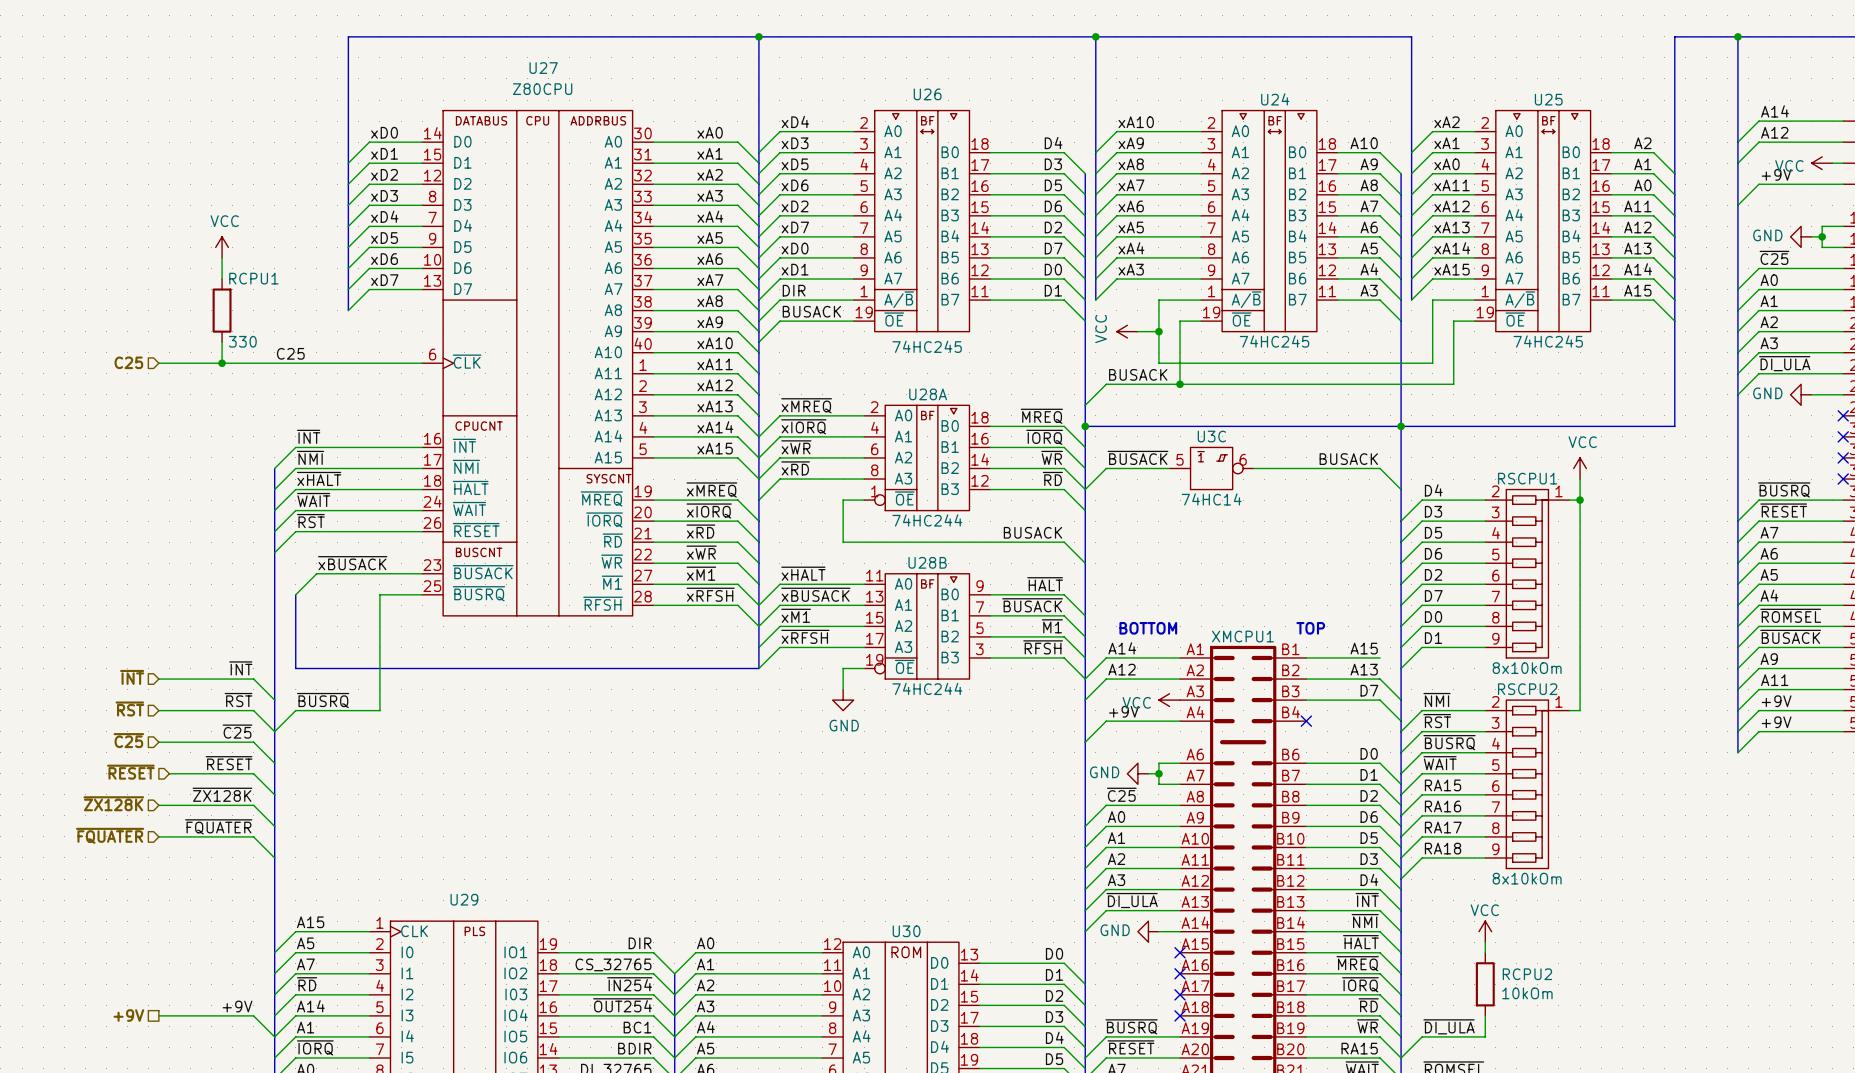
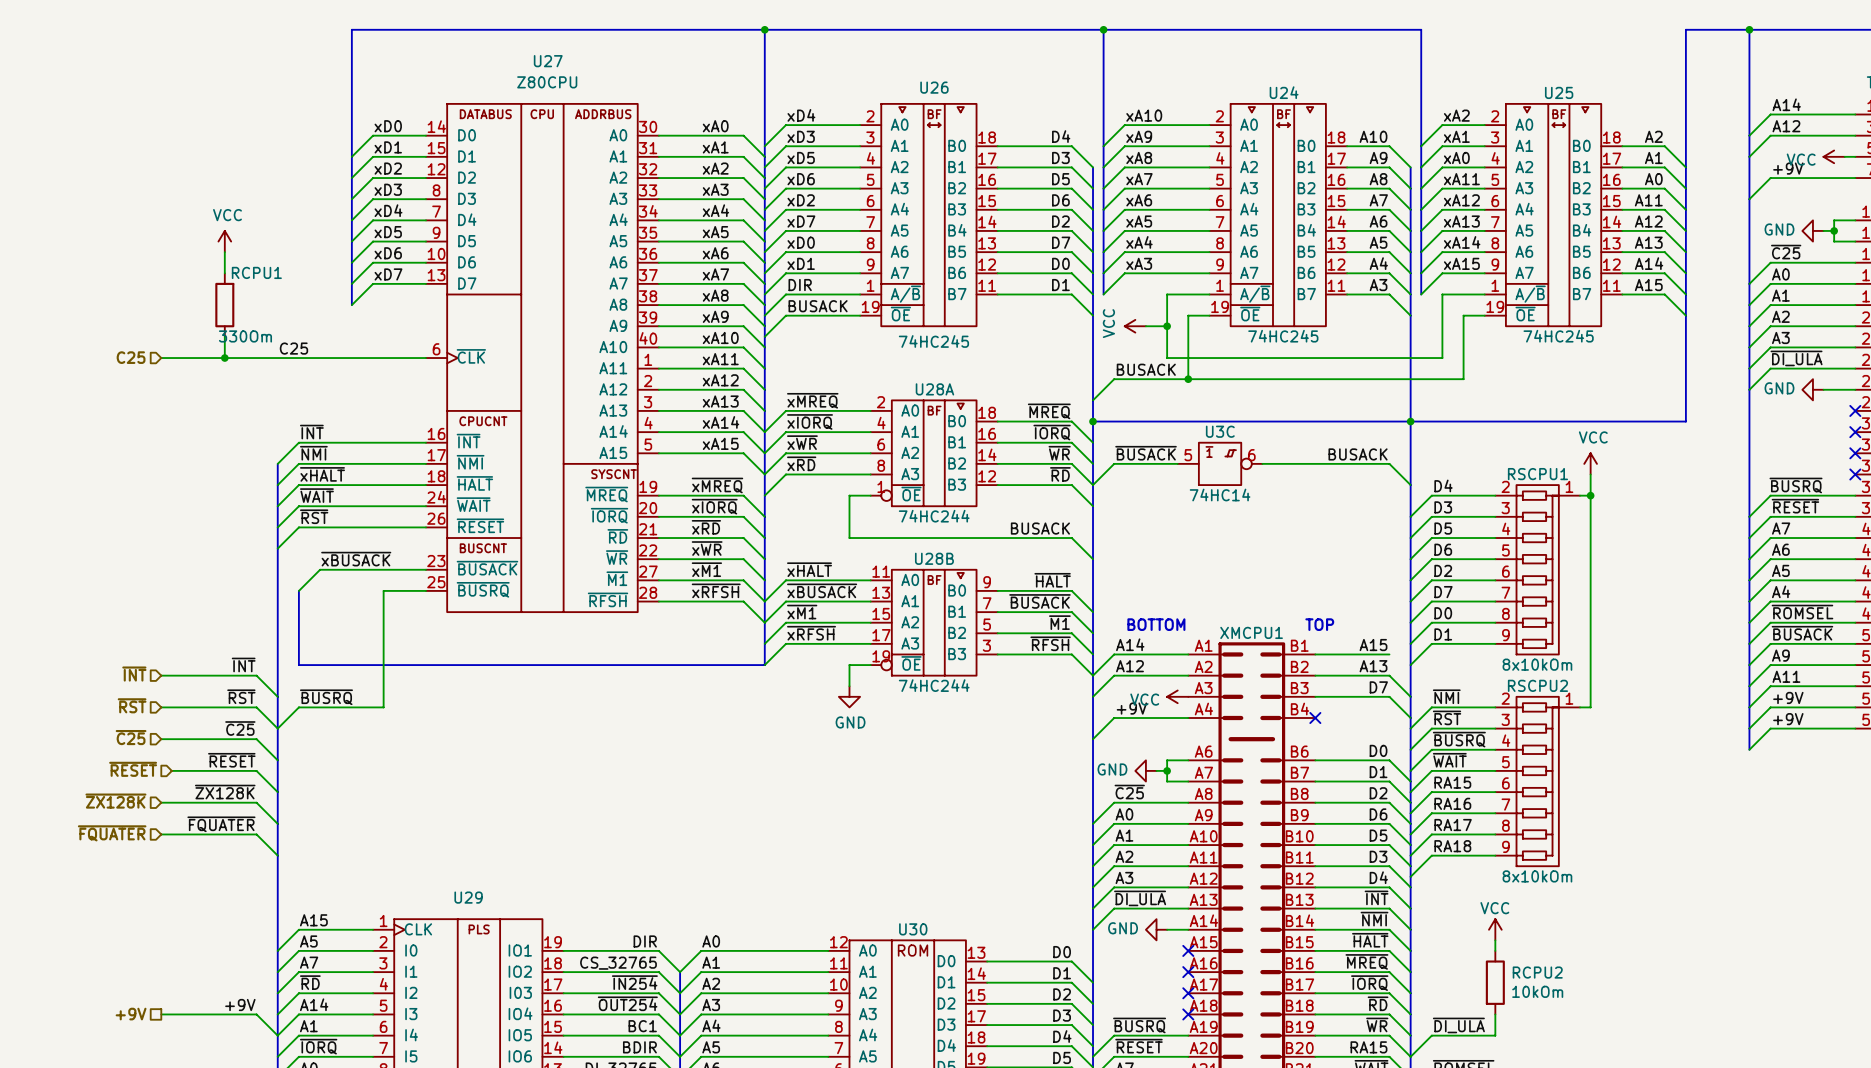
RCPU1 value: 330 (242, 341) -> 330Om (245, 336)

